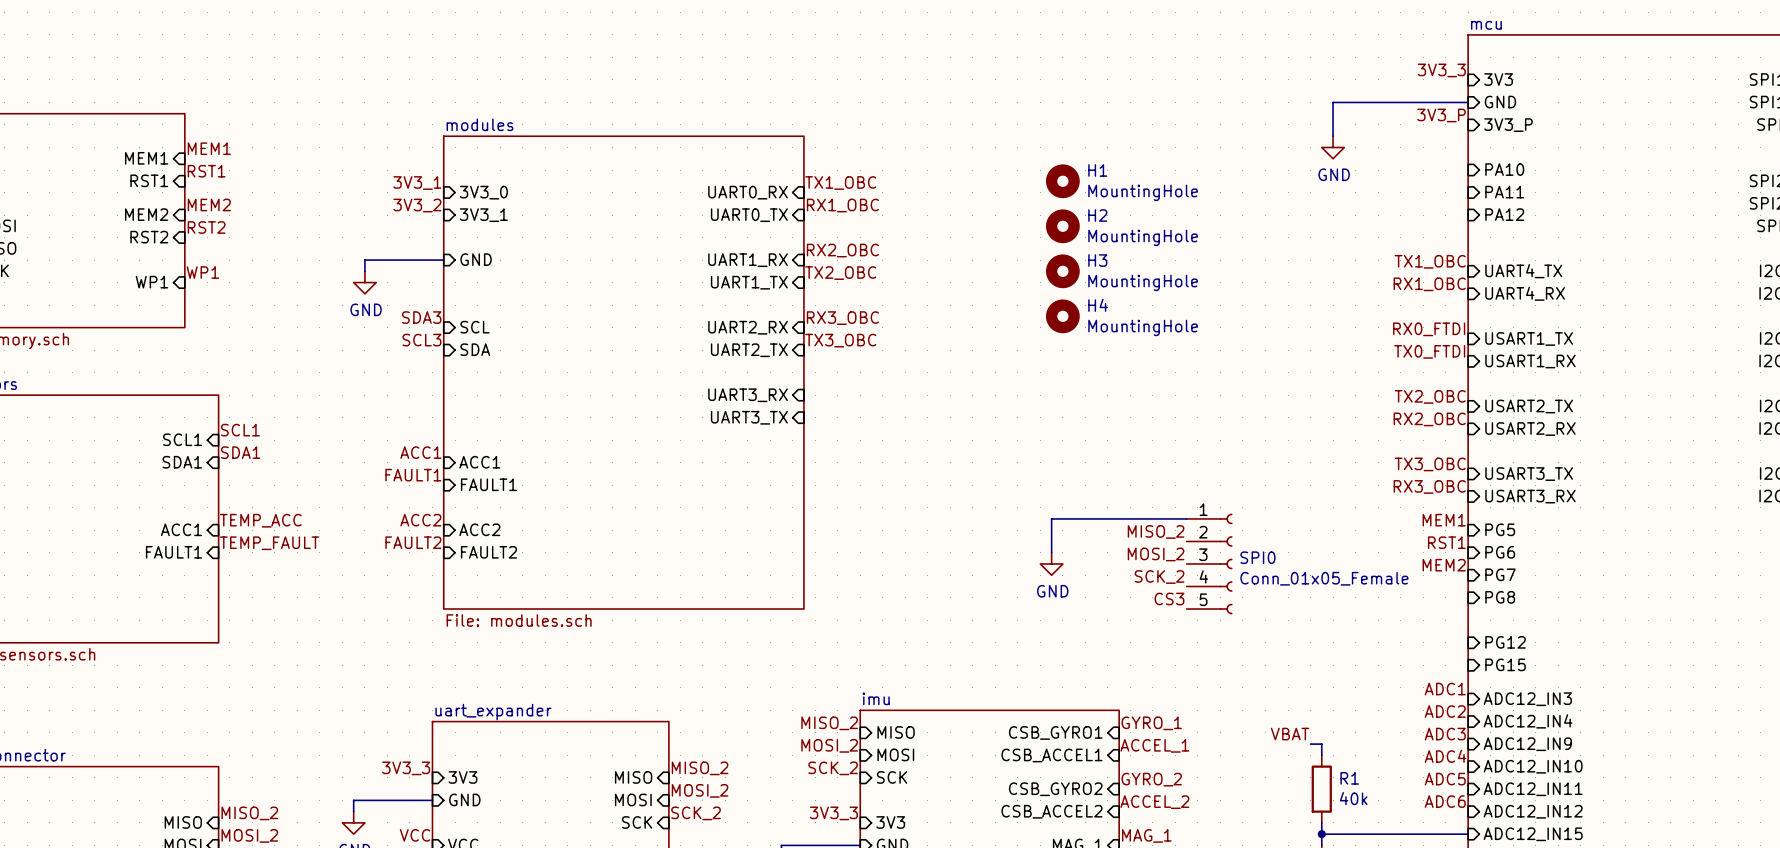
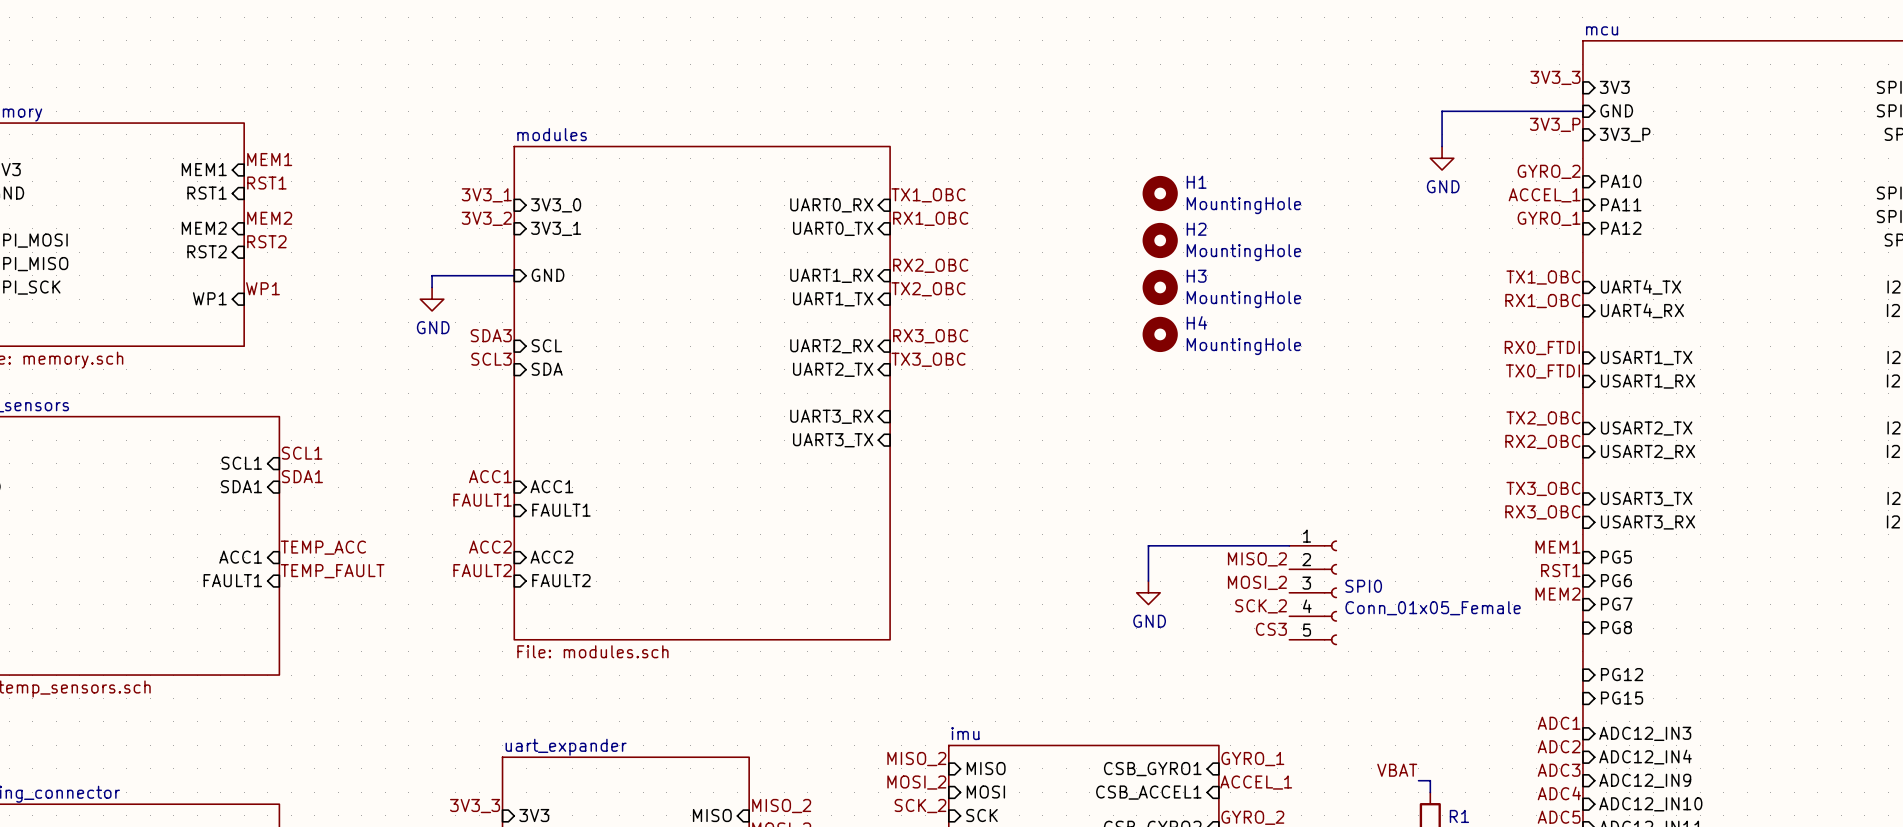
label: none -> GYRO_2 (1549, 171)
label: none -> ACCEL_1 (1544, 195)
label: none -> GYRO_1 (1549, 218)

